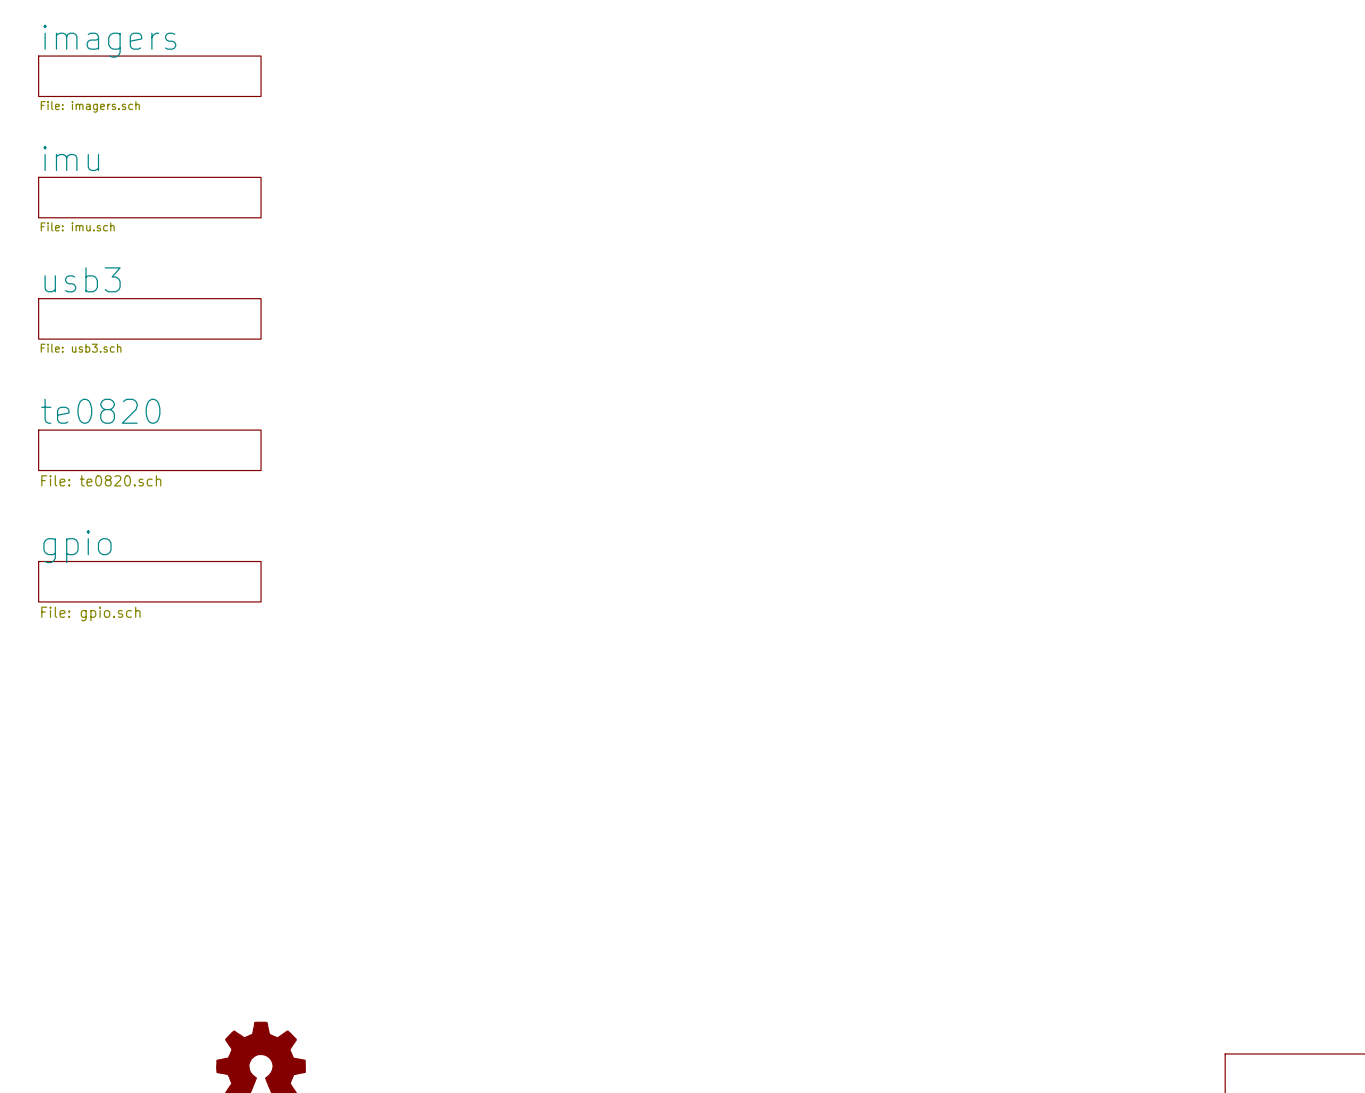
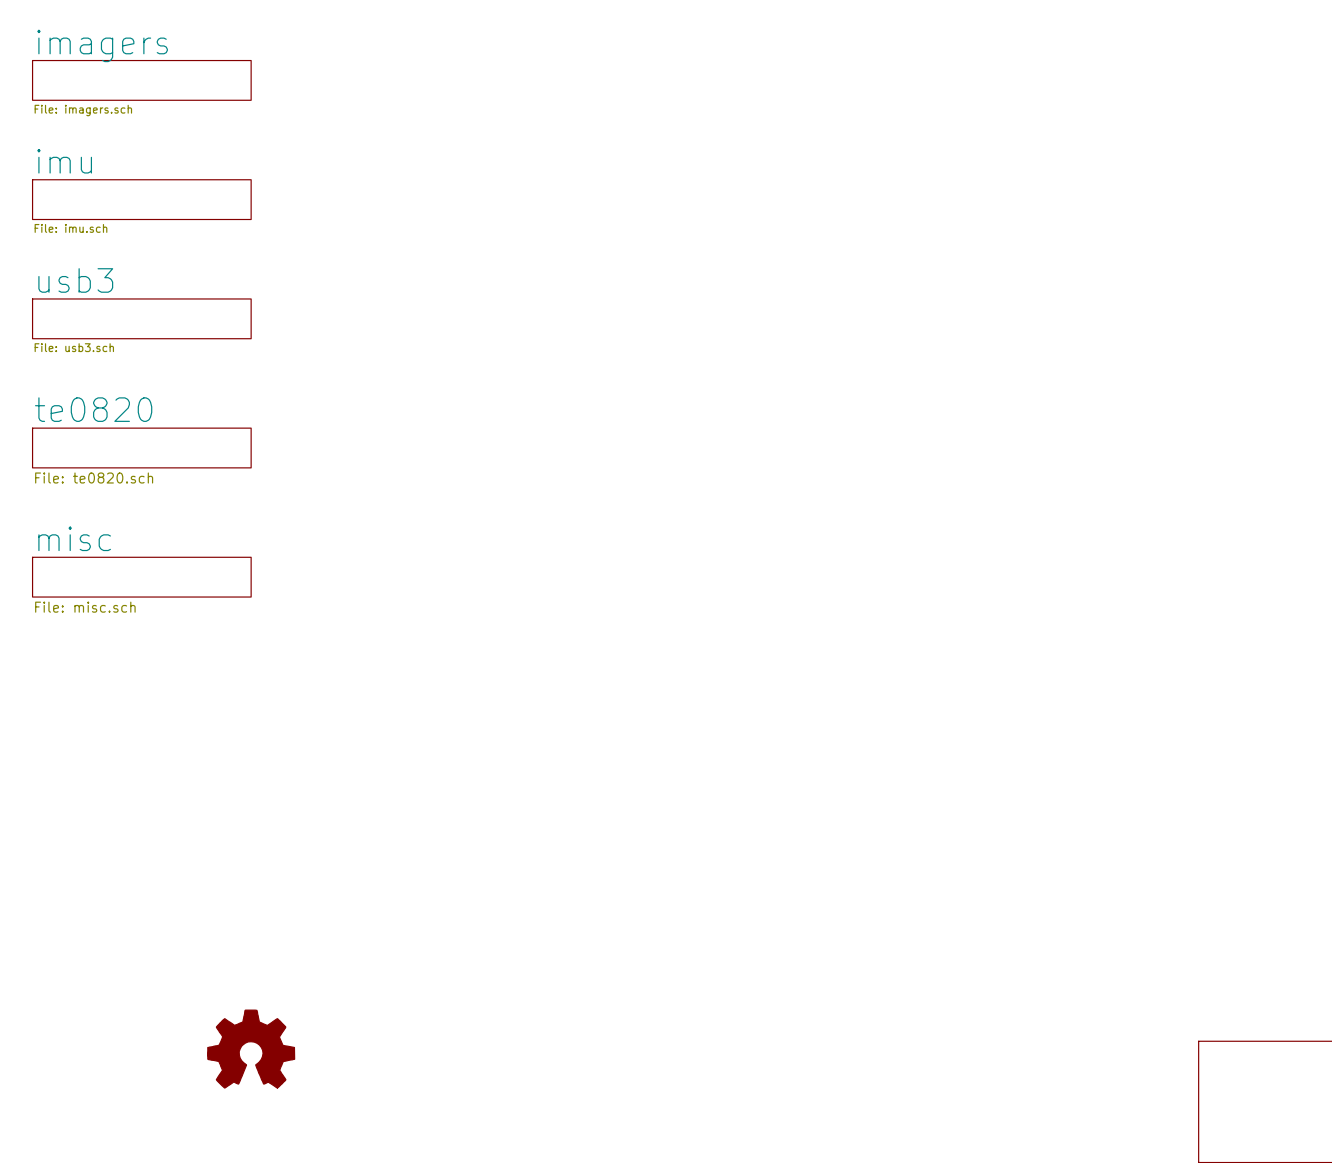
sheet gpio name: gpio (77, 546) -> misc (74, 538)
sheet gpio value: File: gpio.sch (90, 613) -> File: misc.sch (85, 607)

